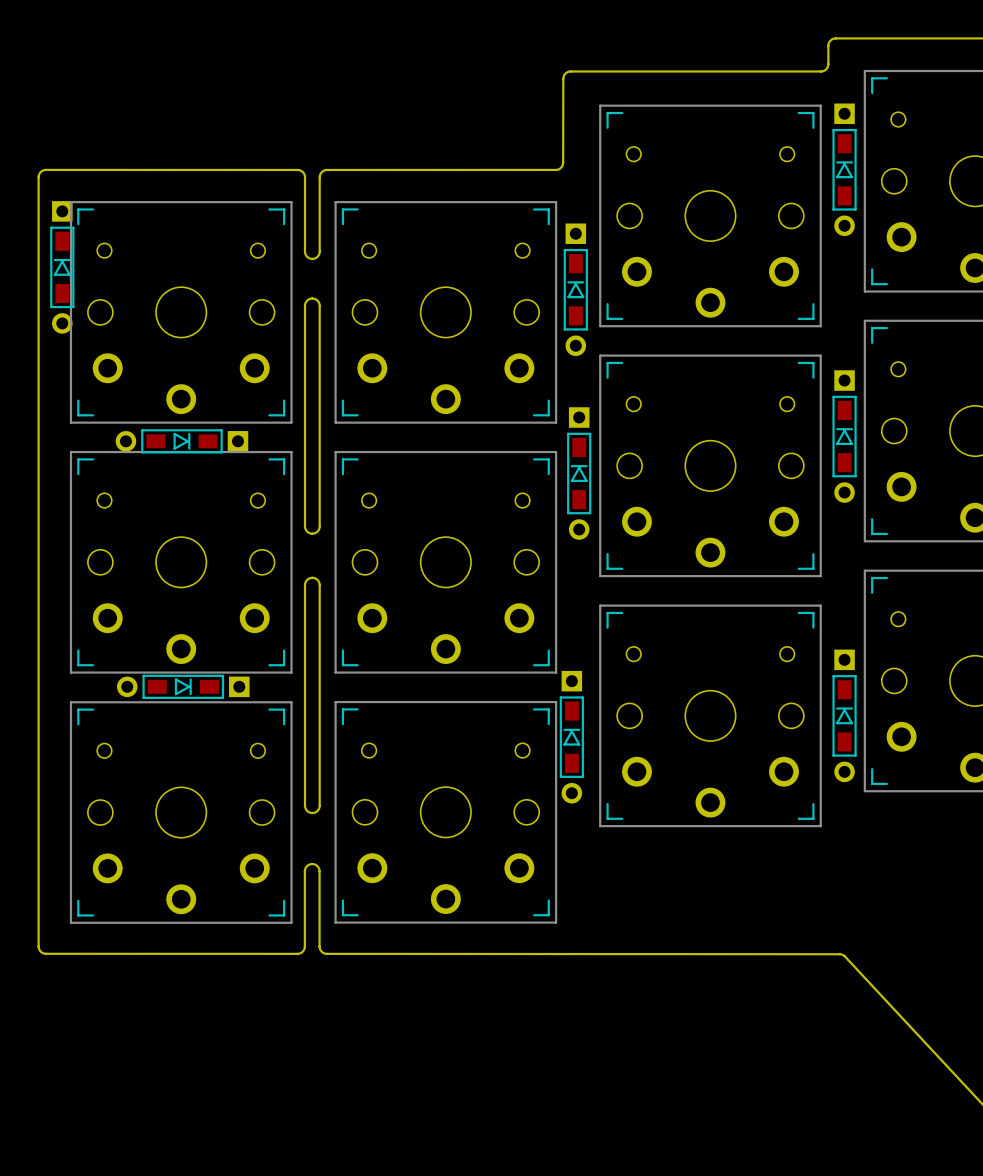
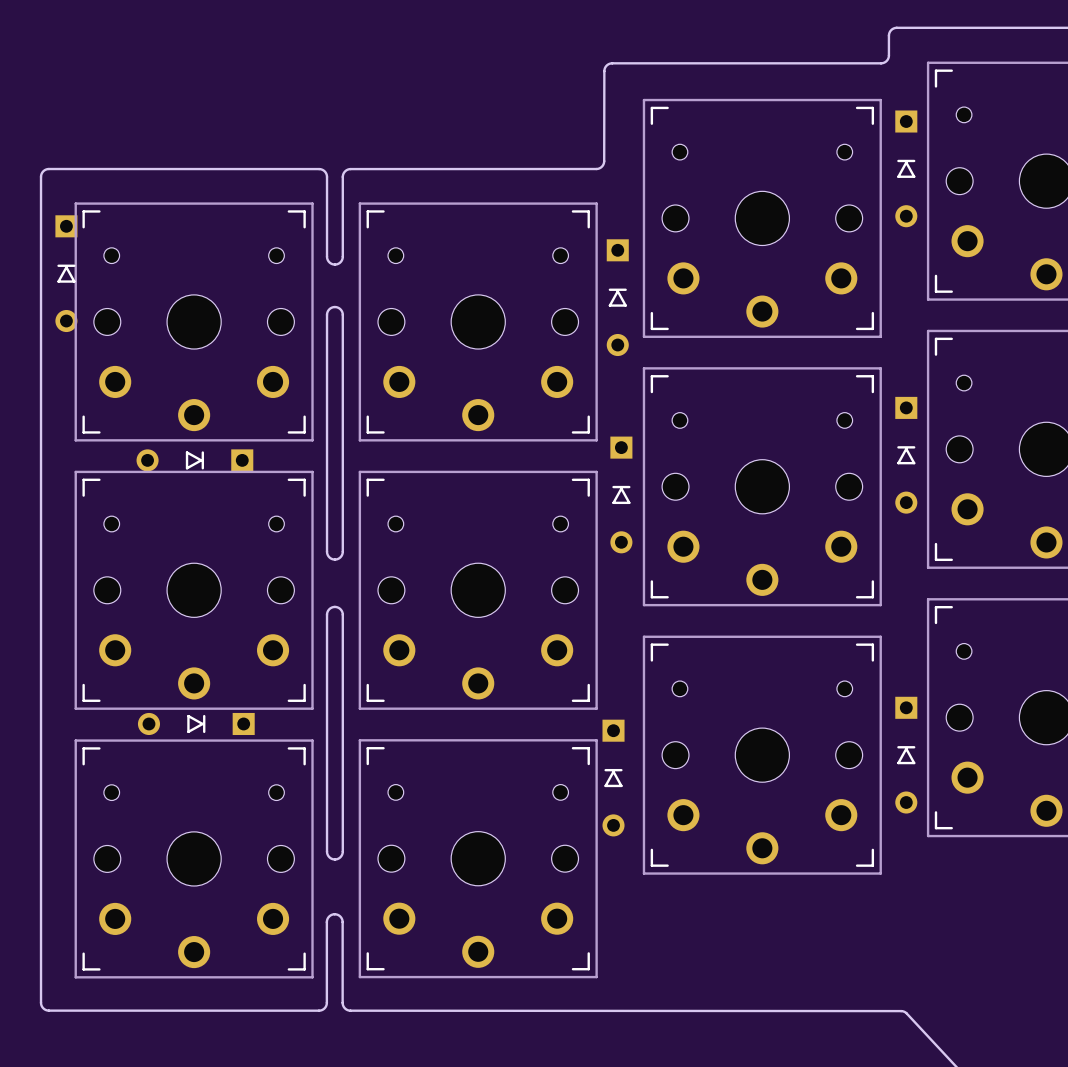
part footprint: [832, 103, 857, 237] -> [895, 110, 918, 228]
part footprint: [50, 201, 75, 334] -> [55, 215, 78, 333]
part footprint: [563, 223, 588, 357] -> [606, 239, 629, 357]
part footprint: [832, 370, 857, 503] -> [895, 396, 918, 514]
part footprint: [567, 407, 592, 540] -> [610, 436, 633, 554]
part footprint: [115, 429, 249, 454] -> [136, 449, 254, 472]
part footprint: [832, 649, 857, 783] -> [895, 696, 918, 814]
part footprint: [559, 670, 584, 804] -> [602, 719, 625, 837]
part footprint: [117, 674, 250, 699] -> [137, 712, 255, 736]

